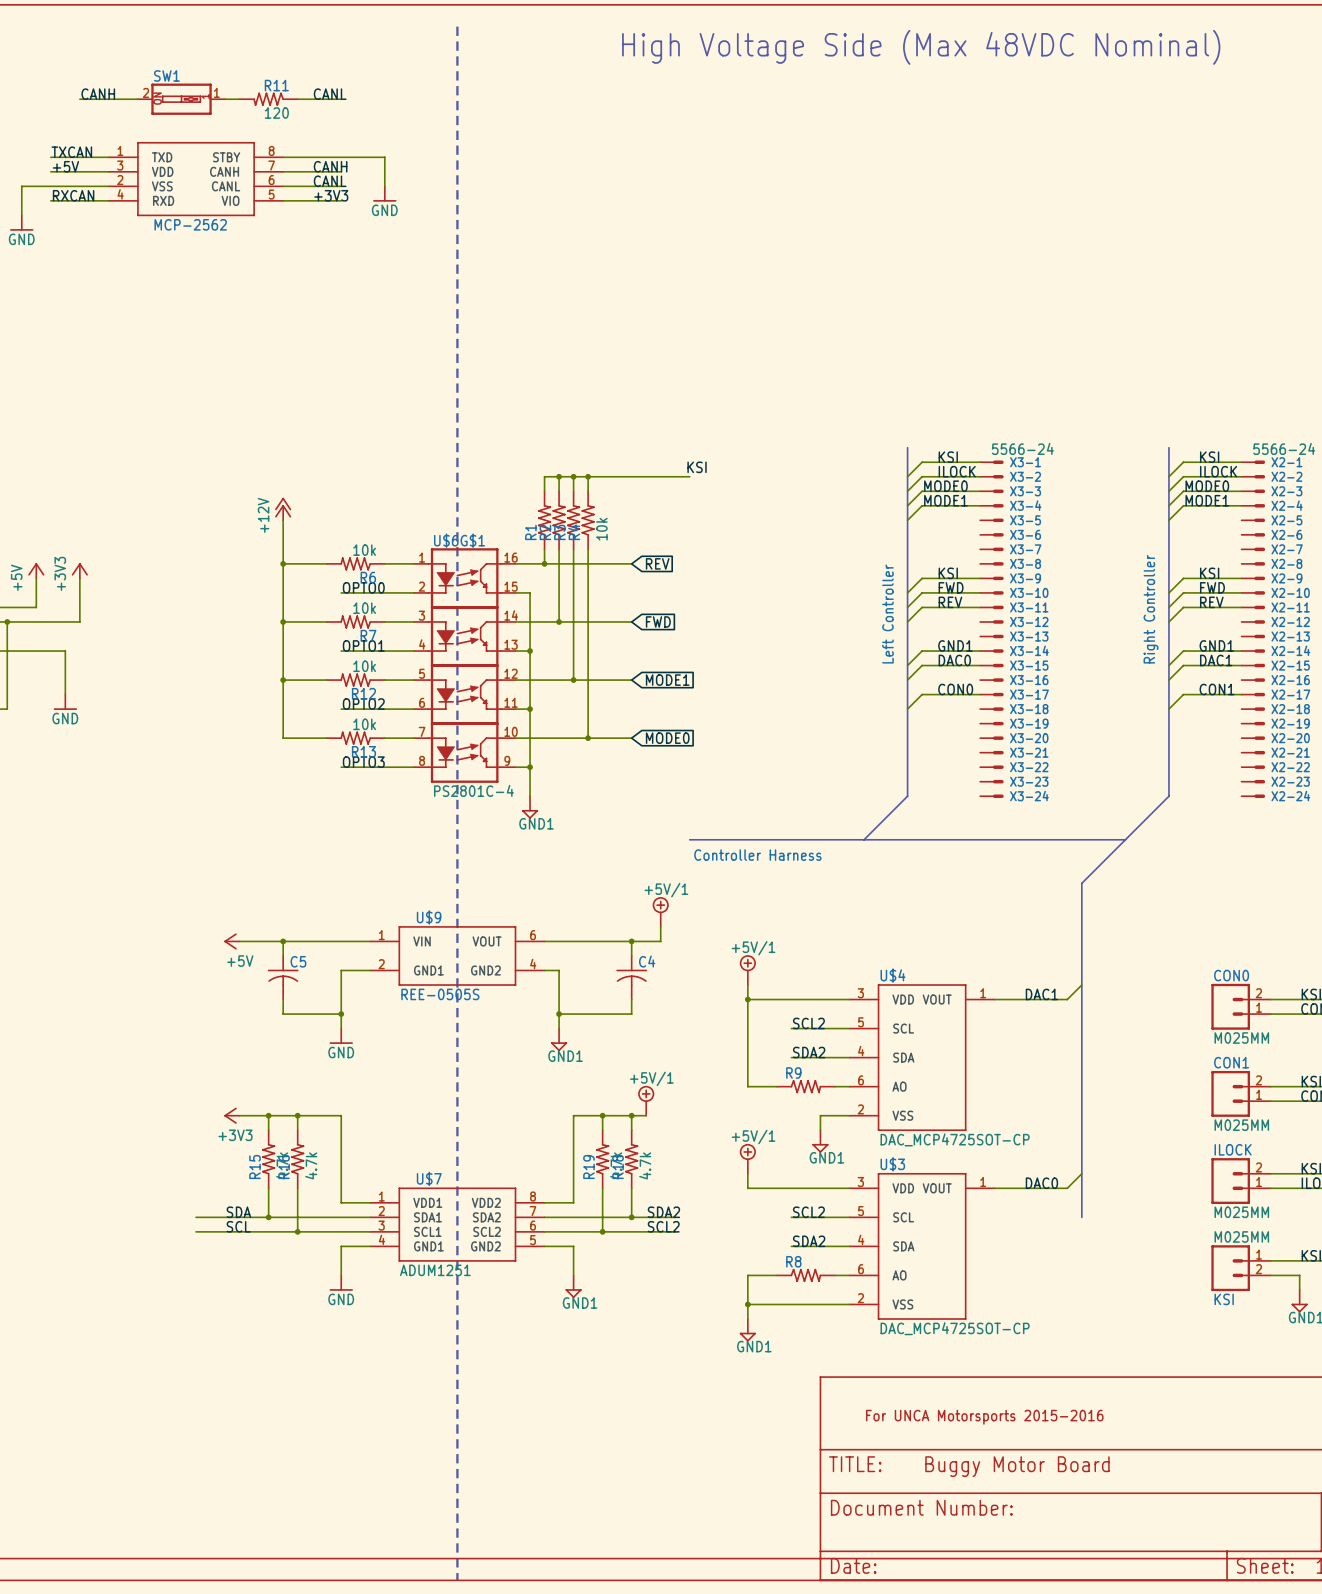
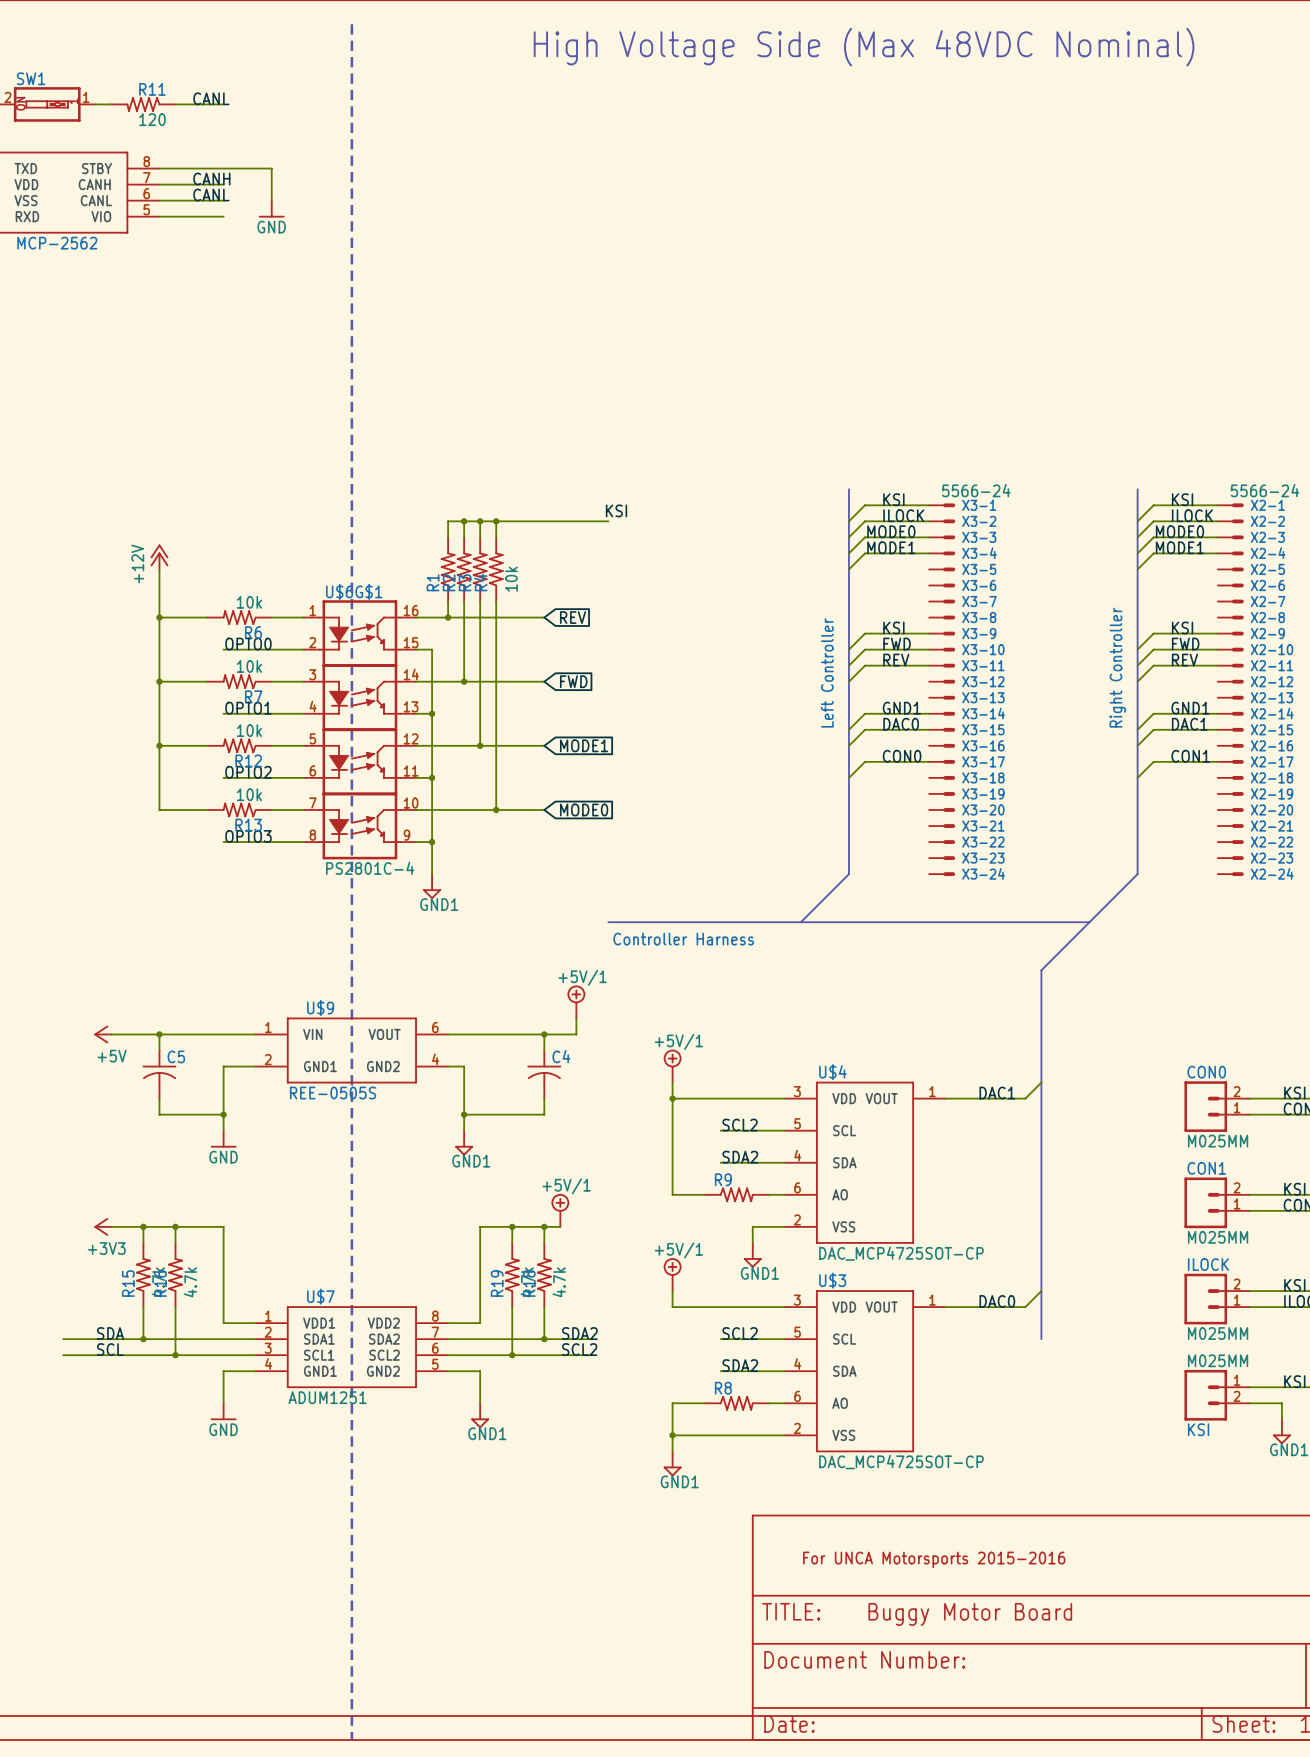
label: +3V3 (331, 195) -> none

